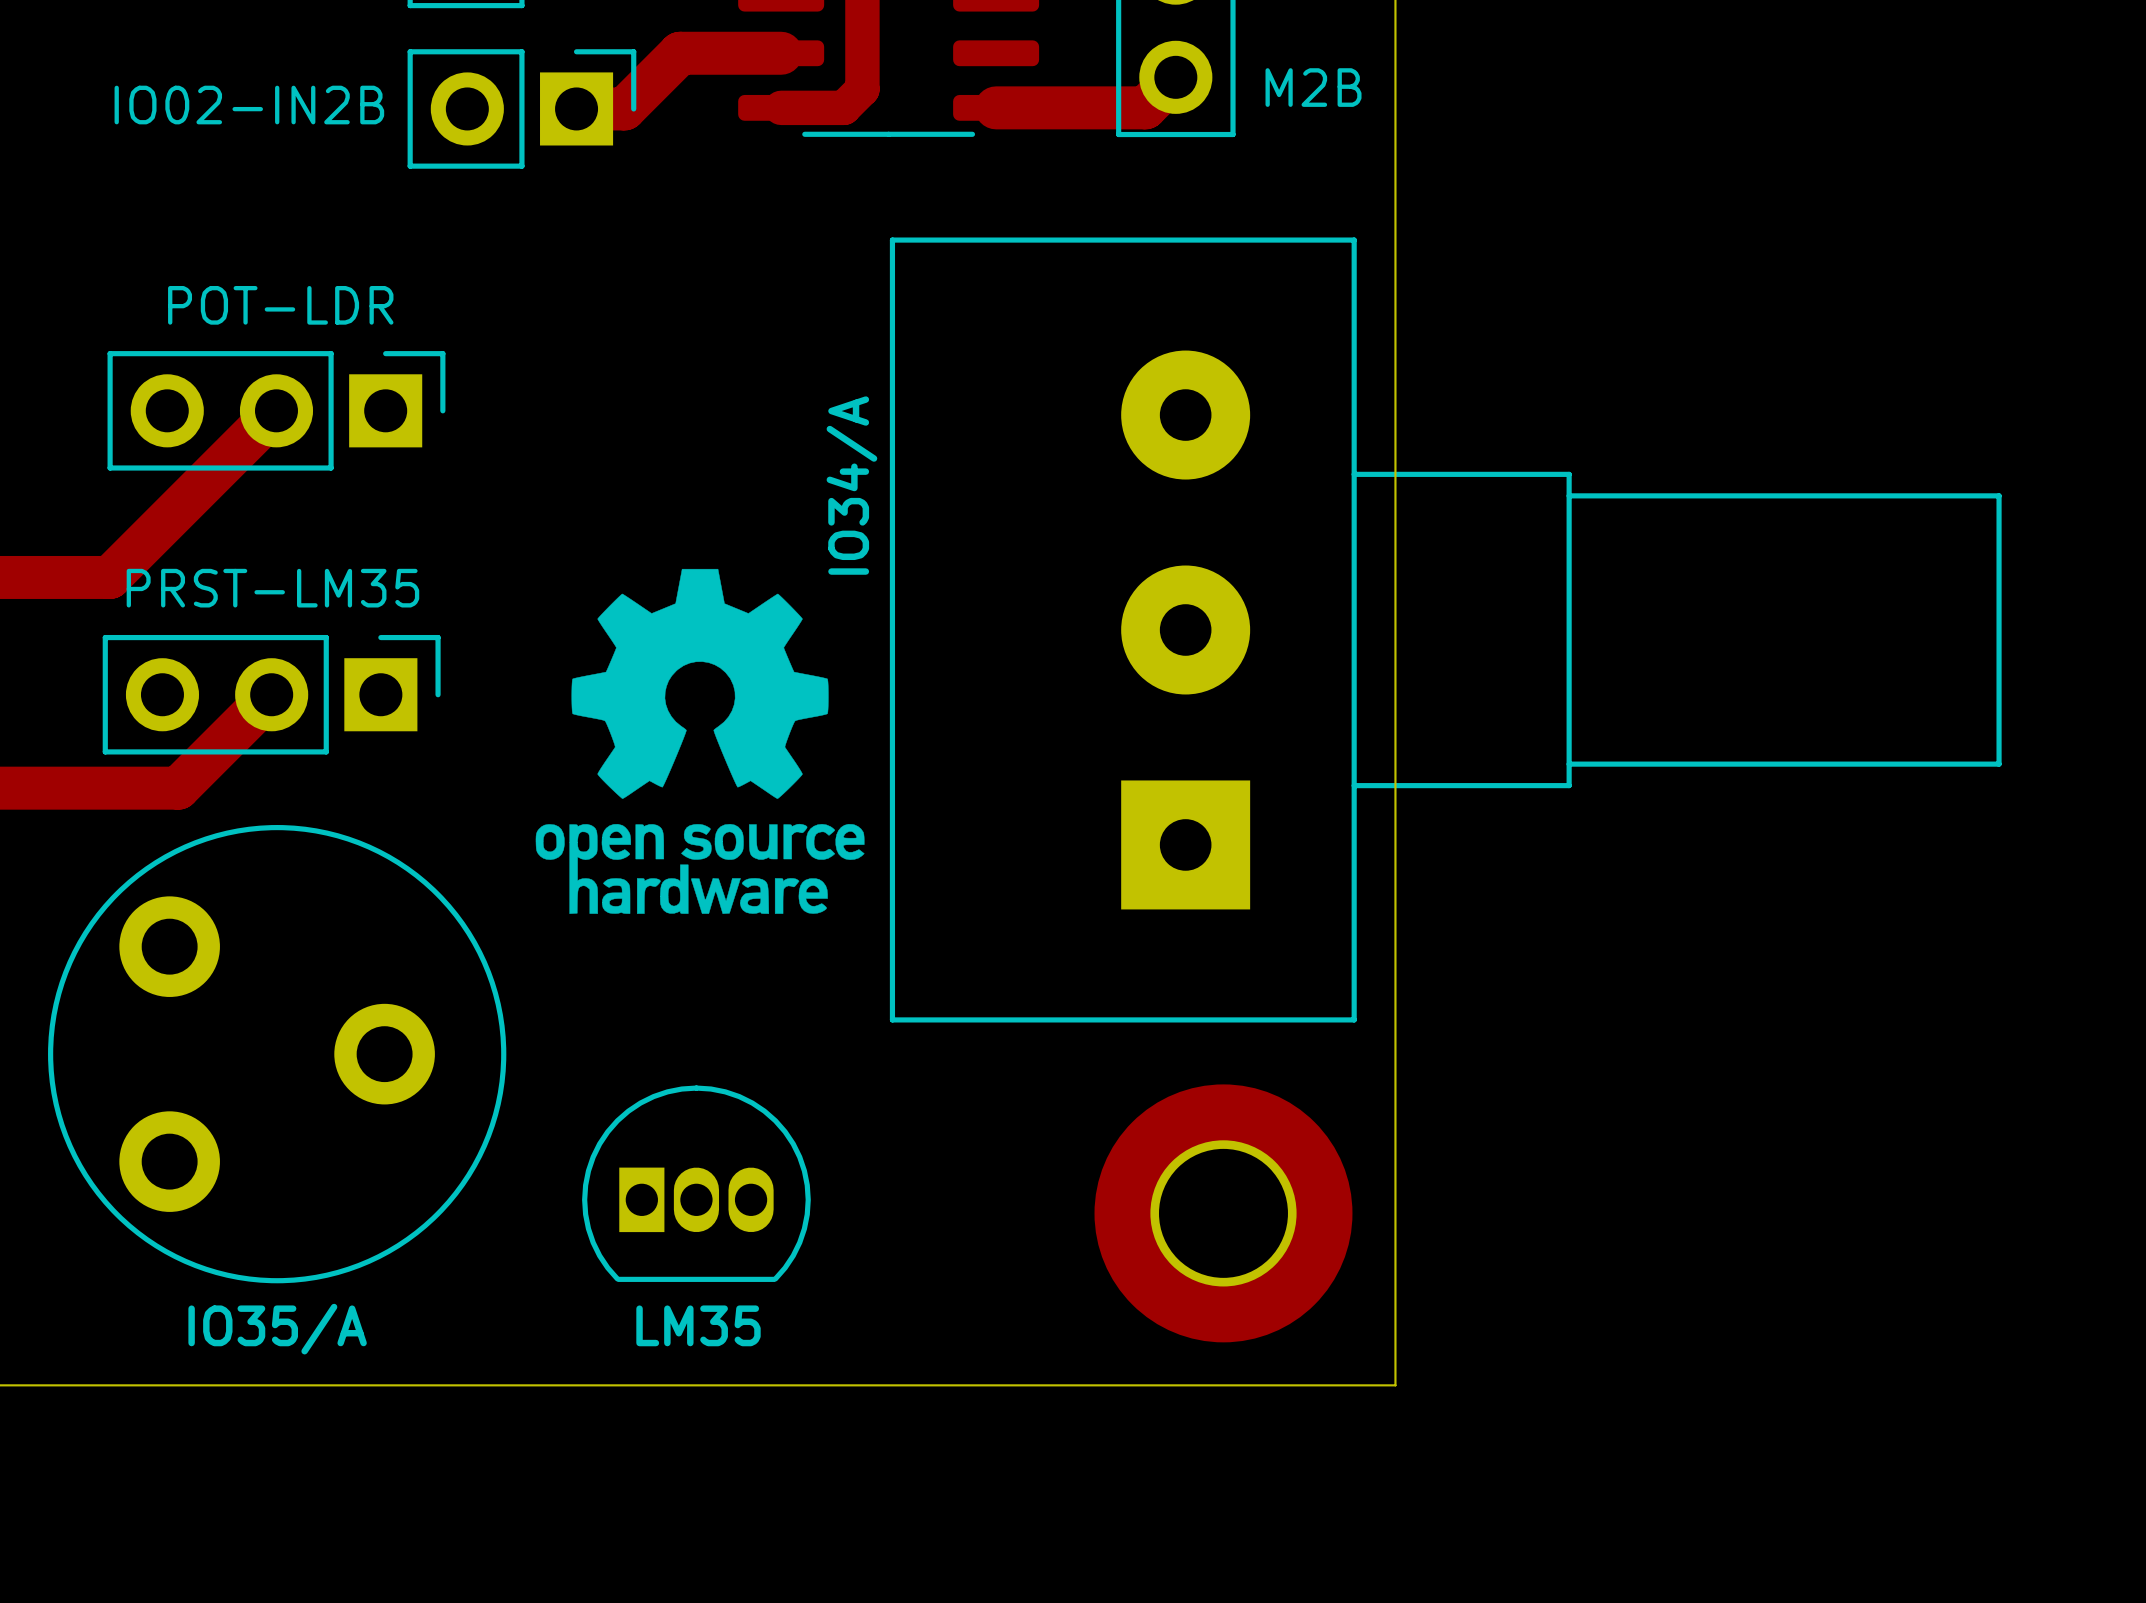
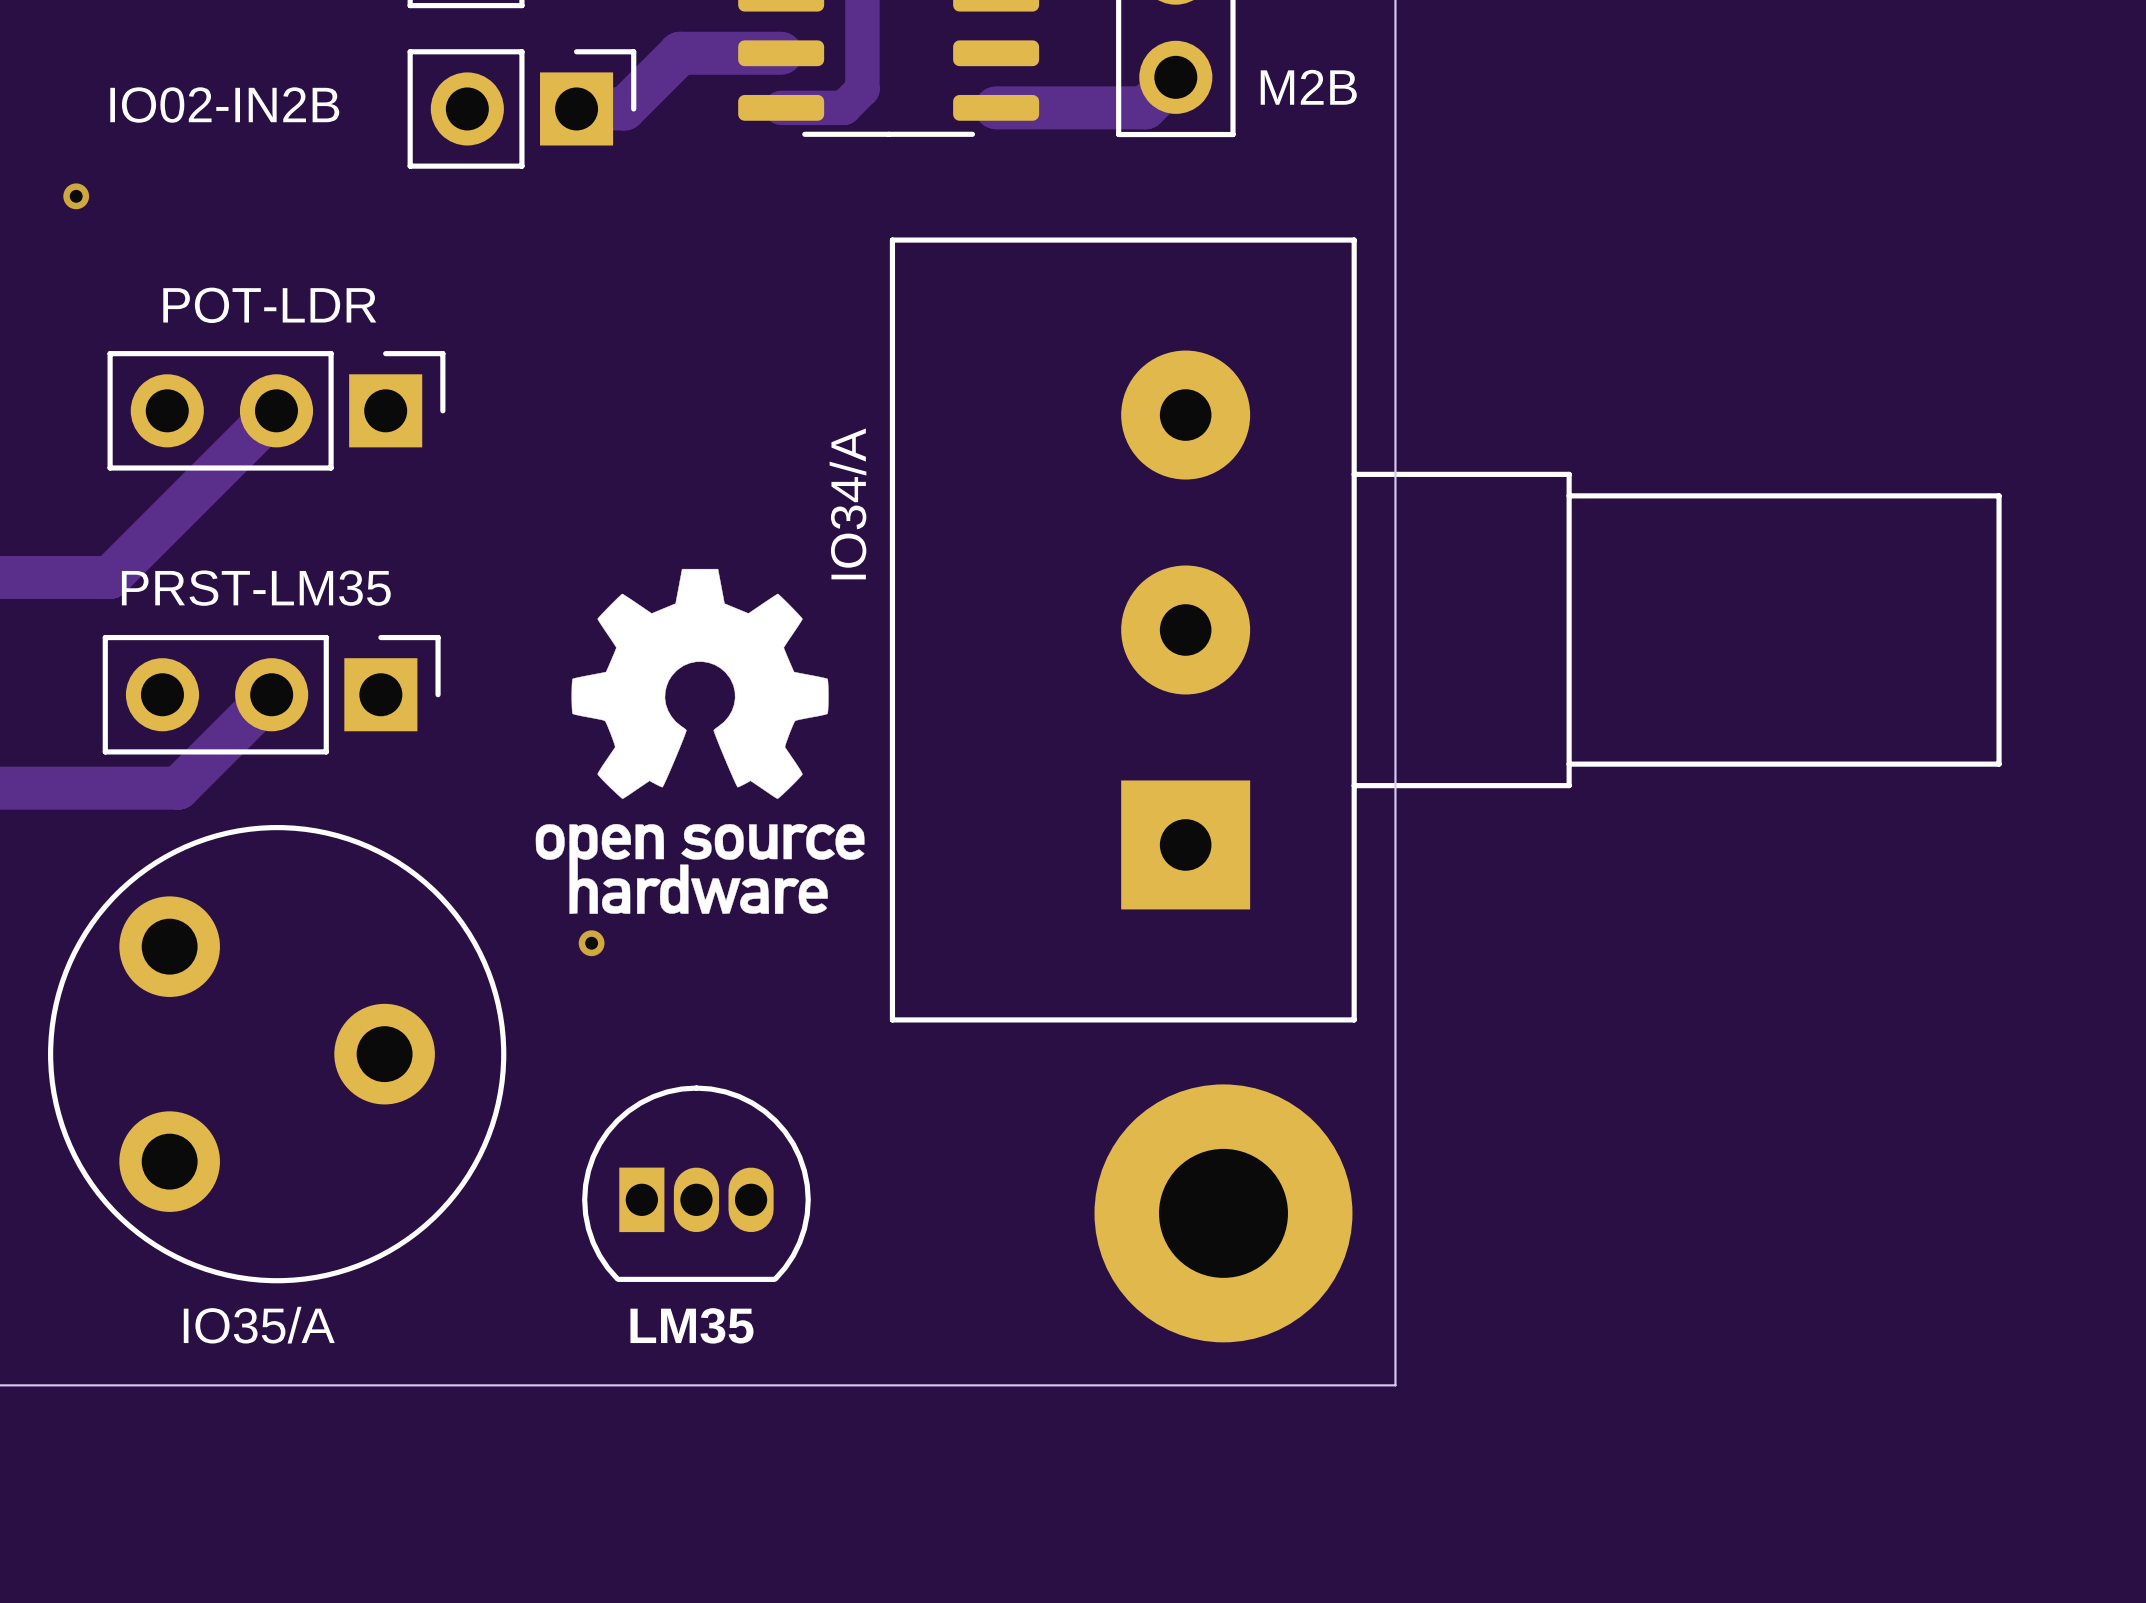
via: none -> (76, 196)
via: none -> (591, 943)

